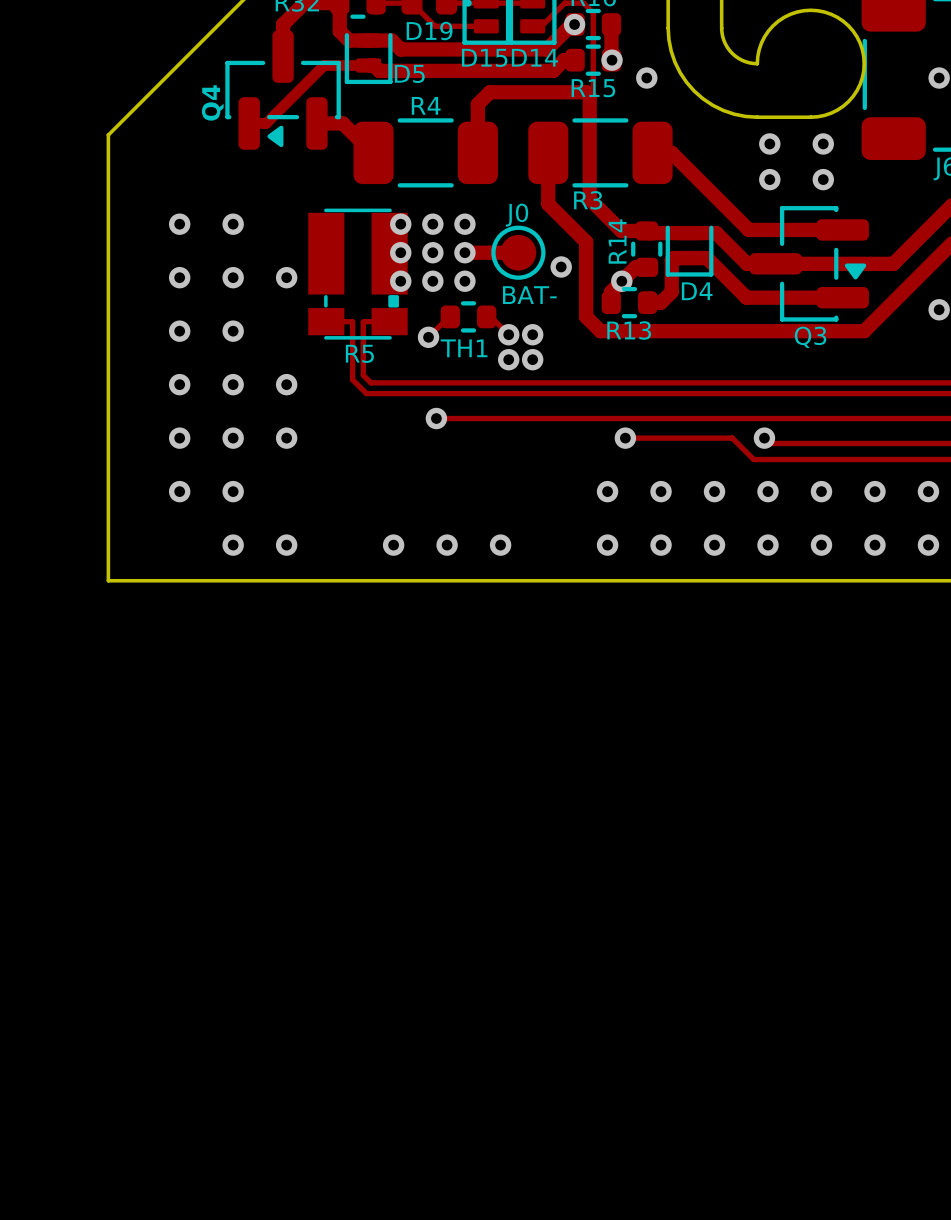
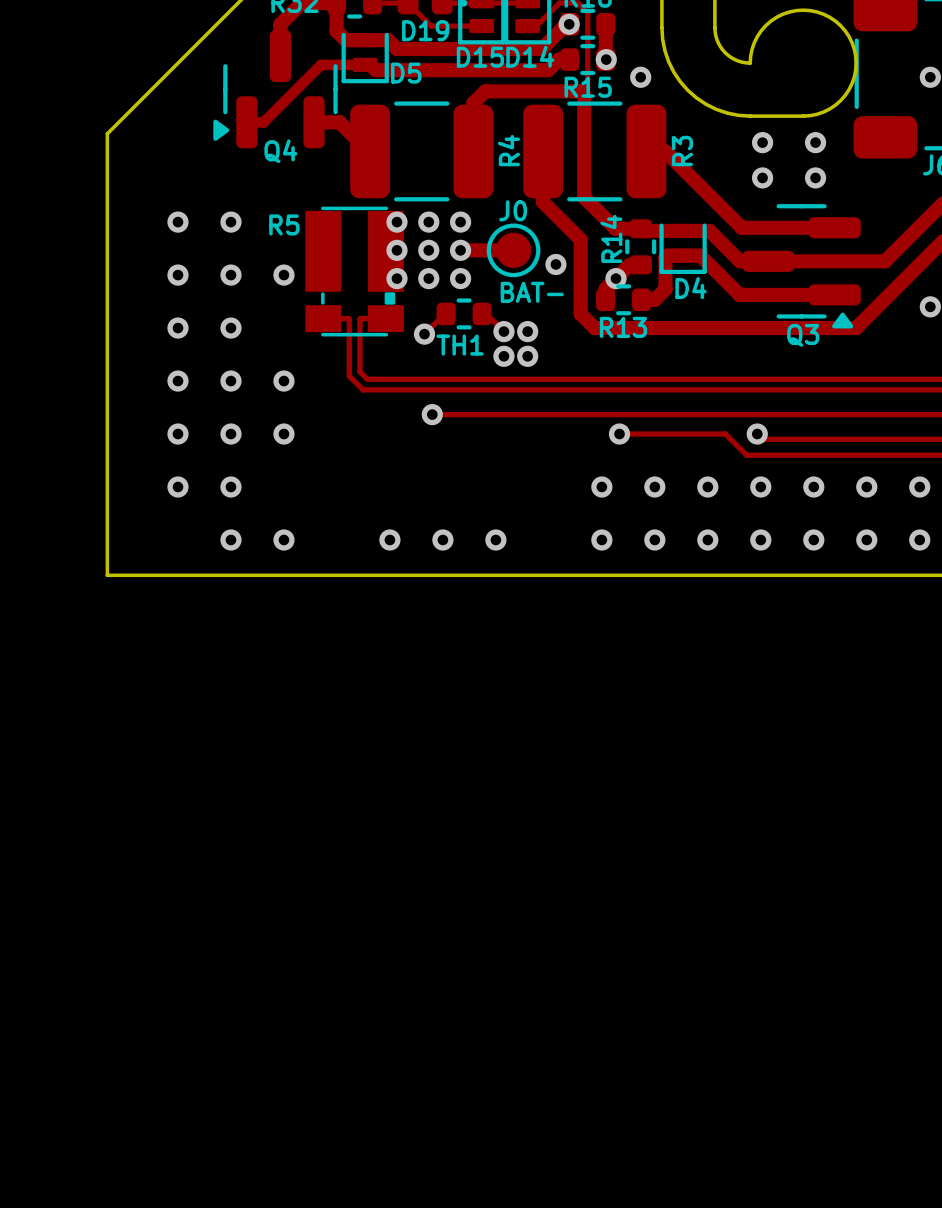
Q4 footprint: [225, 30, 341, 150] -> [213, 30, 338, 149]
Q4 name position: Q4 (212, 102) -> Q4 (280, 151)
R4 name rotation: 0° (426, 105) -> 90° counterclockwise (508, 150)
R4 name position: R4 (426, 105) -> R4 (508, 150)
R4 footprint: [353, 118, 498, 188] -> [350, 101, 494, 202]
R3 footprint: [528, 118, 673, 188] -> [523, 101, 667, 202]
R3 name rotation: 0° (588, 200) -> 90° counterclockwise (682, 151)
R3 name position: R3 (588, 200) -> R3 (682, 151)
Q3 footprint: [749, 206, 869, 322] -> [742, 204, 861, 329]
R5 name position: R5 (359, 353) -> R5 (284, 224)

